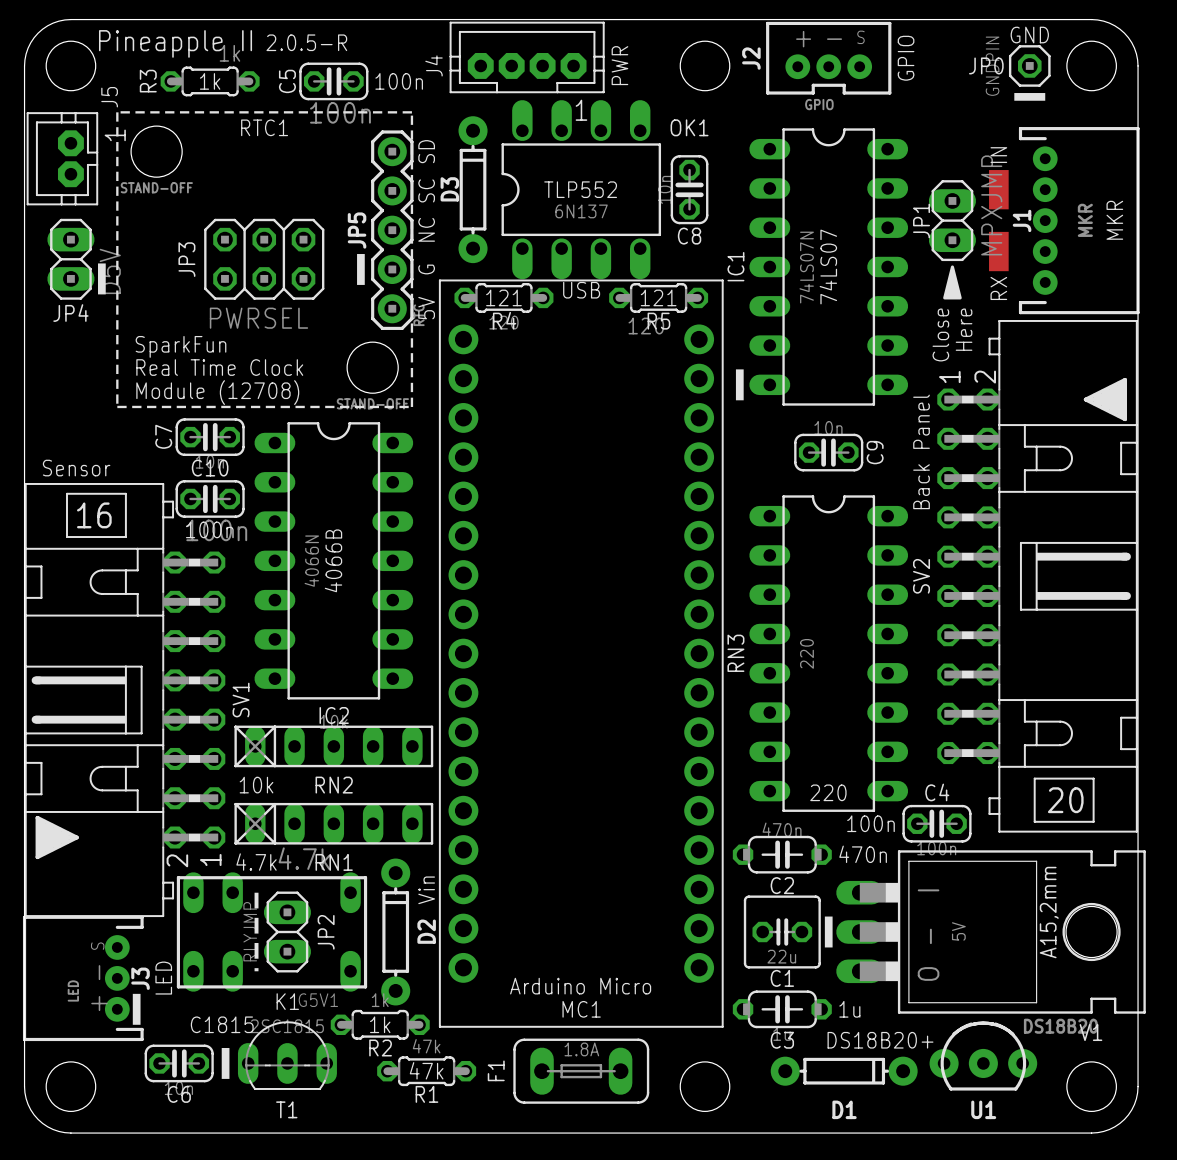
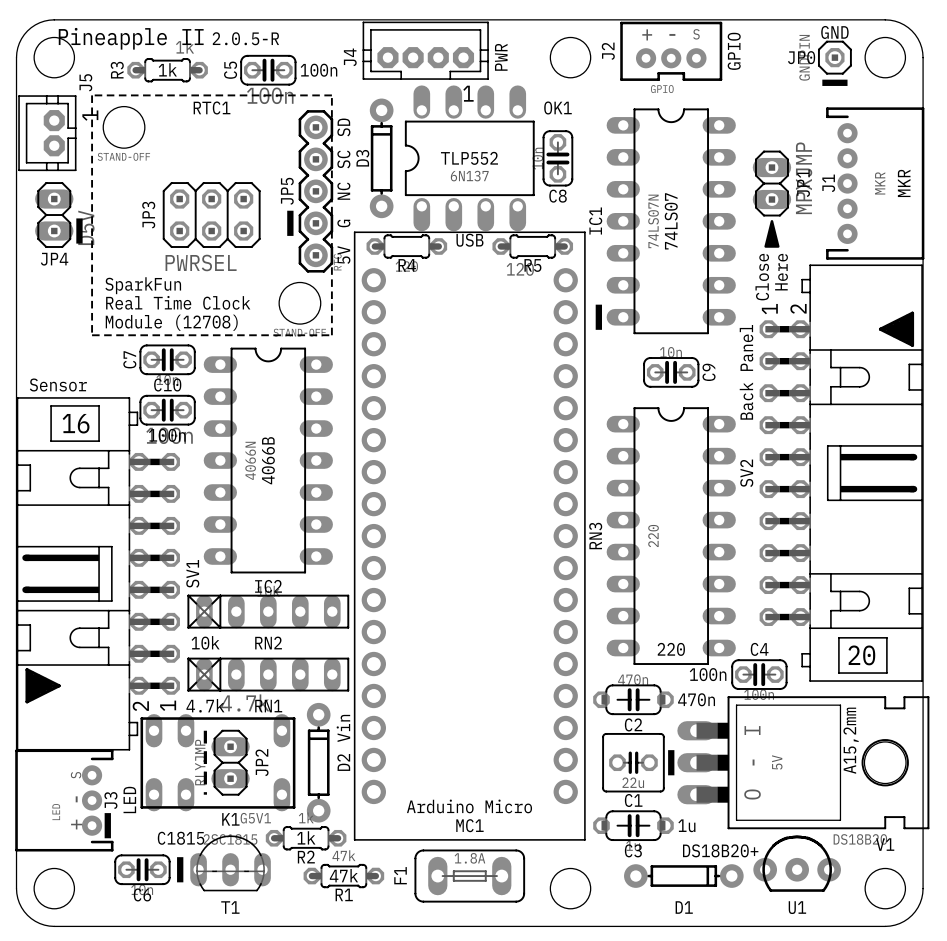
IN: (998, 189) -> none
JP1 name position: JP1 (921, 220) -> JP1 (803, 183)
RX: (998, 251) -> none
text: 121 (503, 297) -> none
text: 121 (658, 297) -> none

